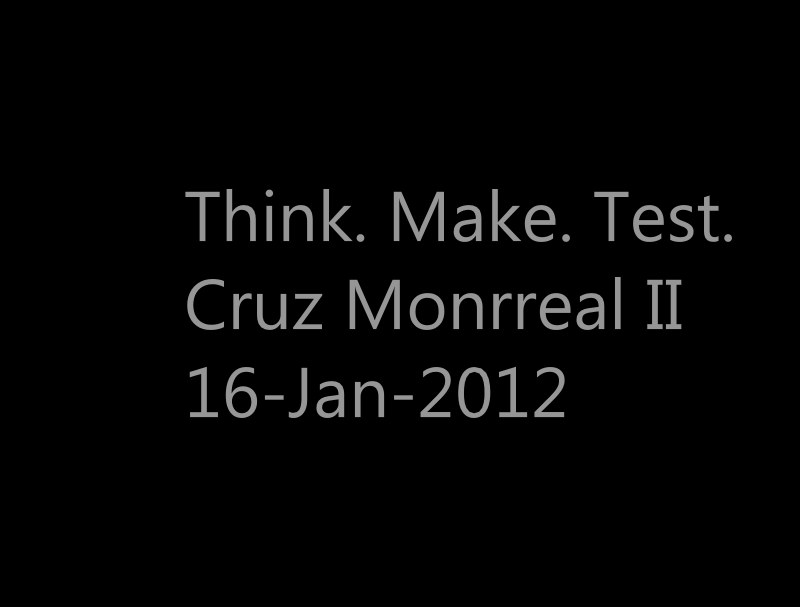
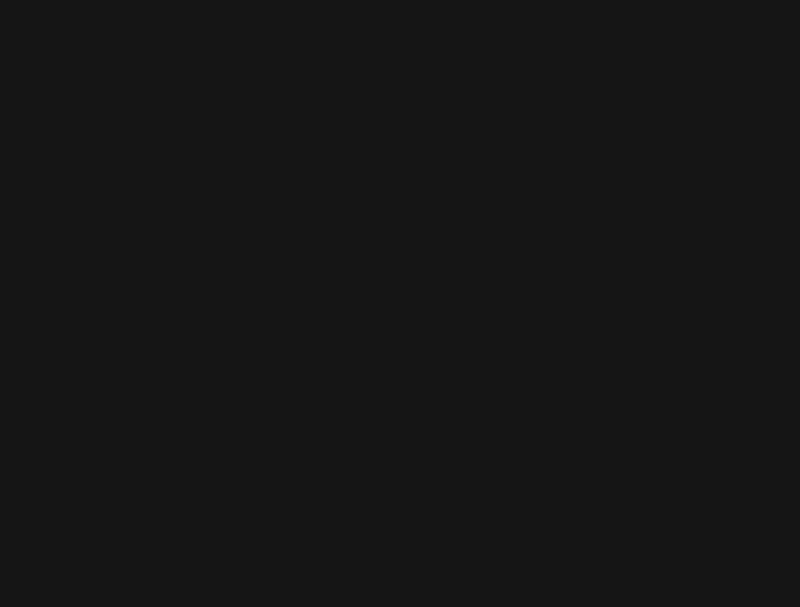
drawing: [185, 188, 732, 418] -> none

